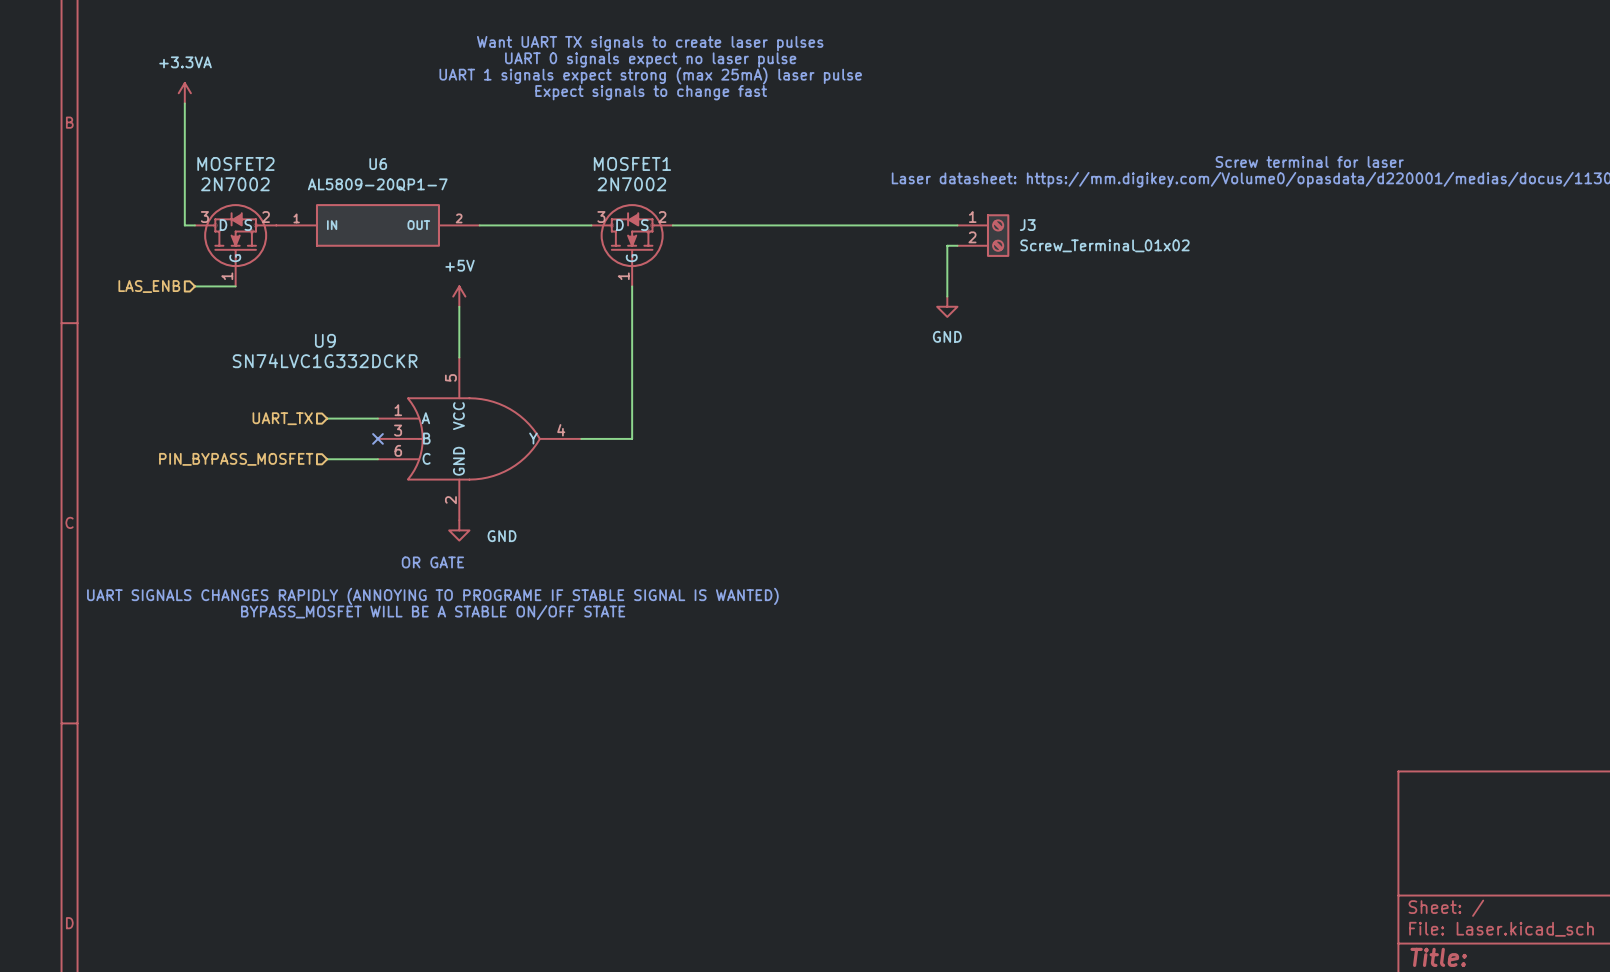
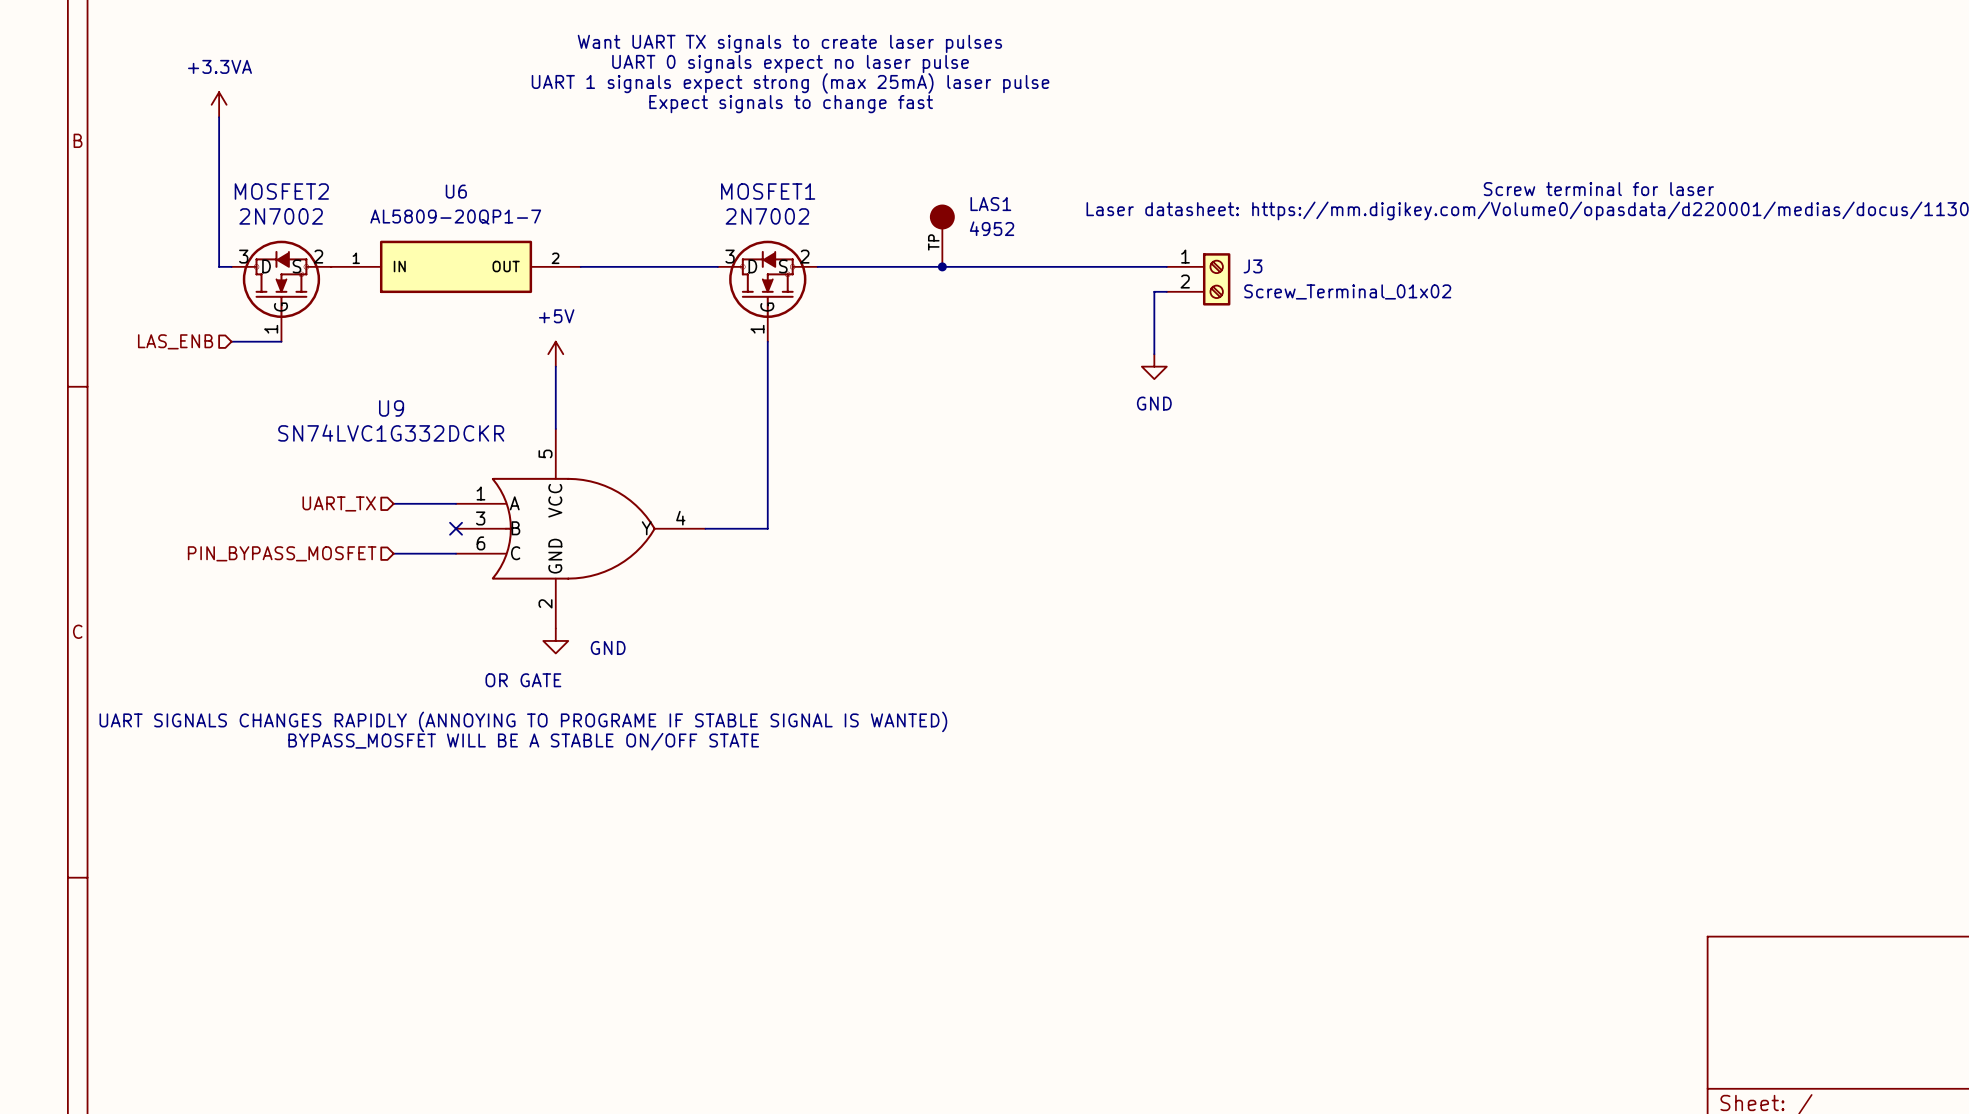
LAS1: none -> 4952 (942, 235)
junction: none -> (942, 266)

